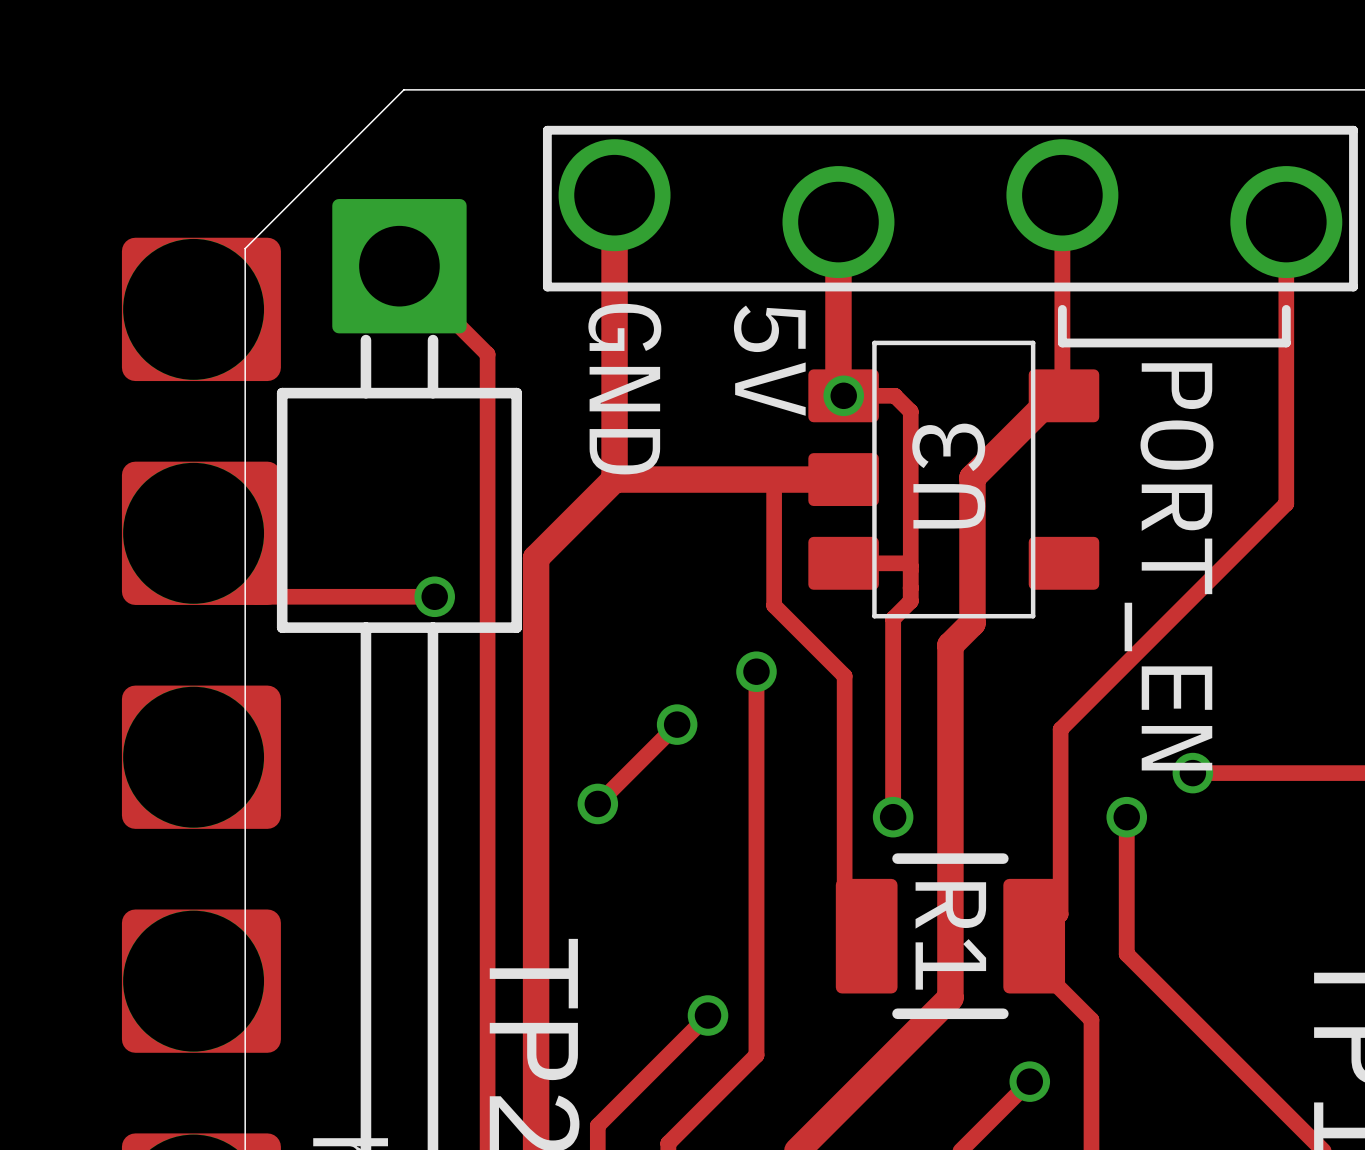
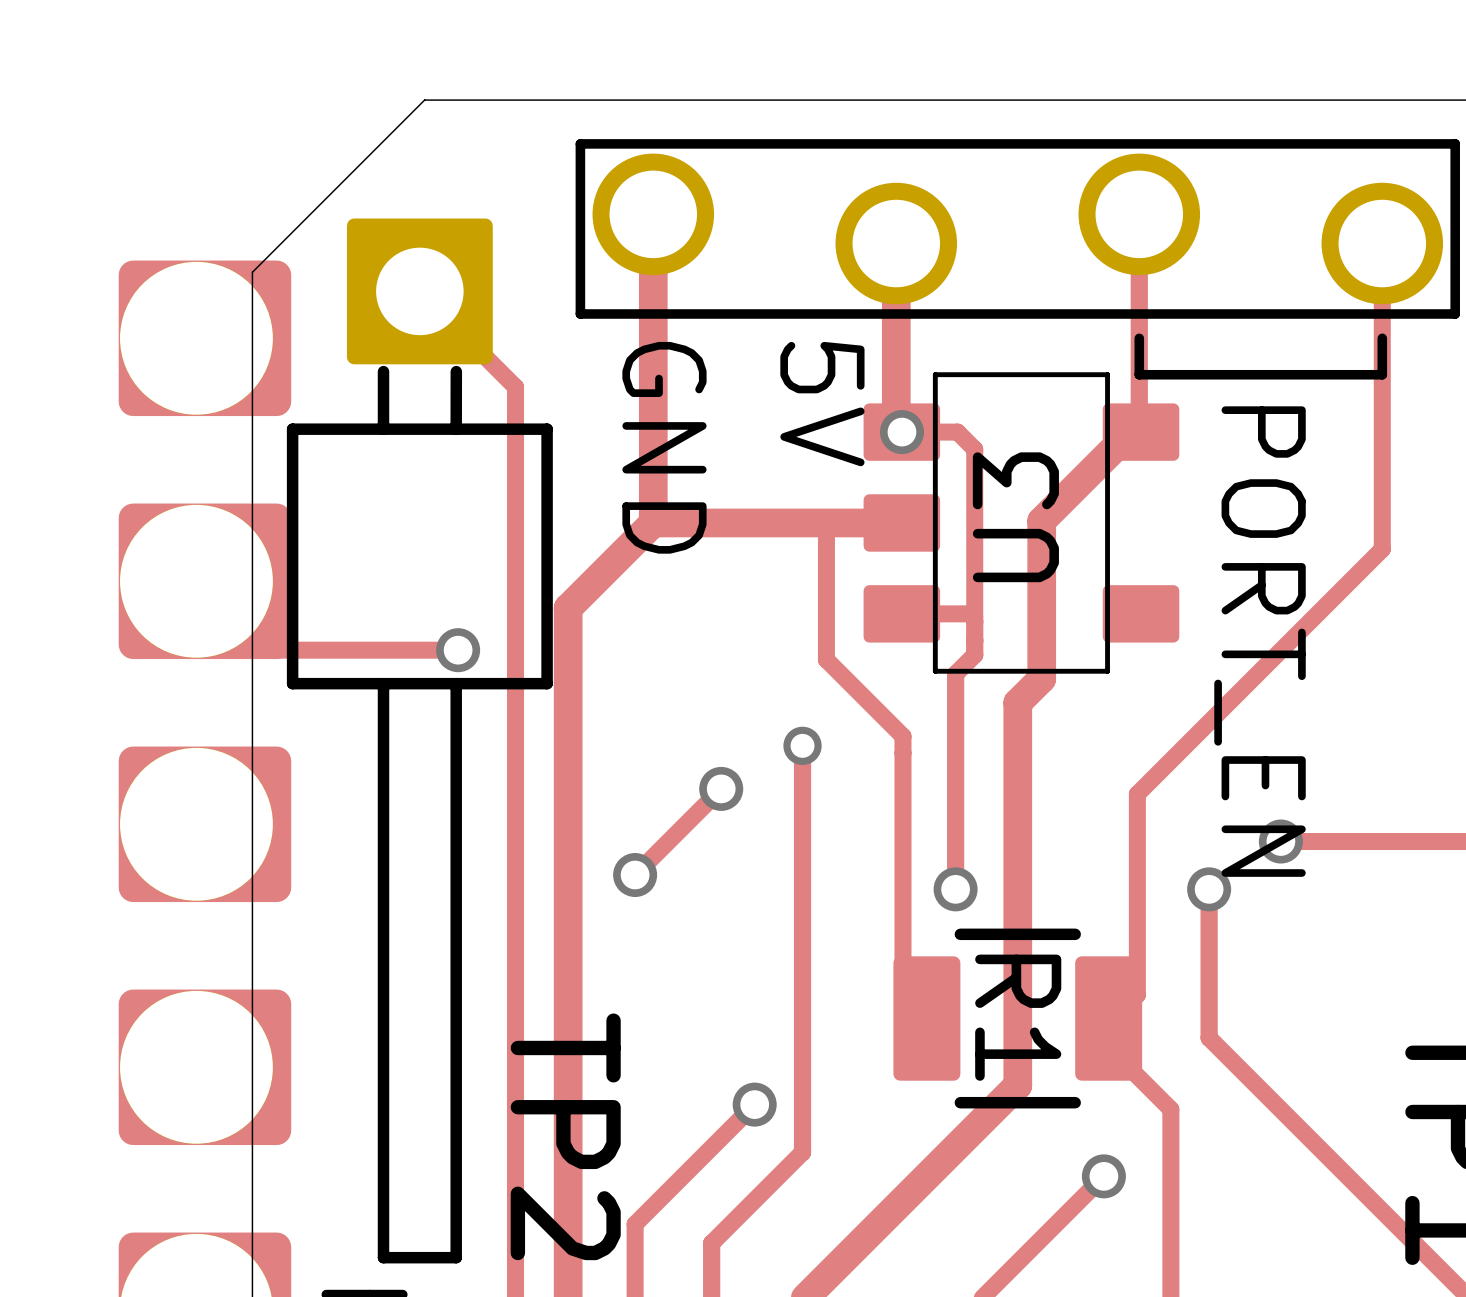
track: (756, 671) (756, 1055) (752, 1059) -> (802, 745) (802, 1152)
via position: (756, 671) -> (802, 745)

